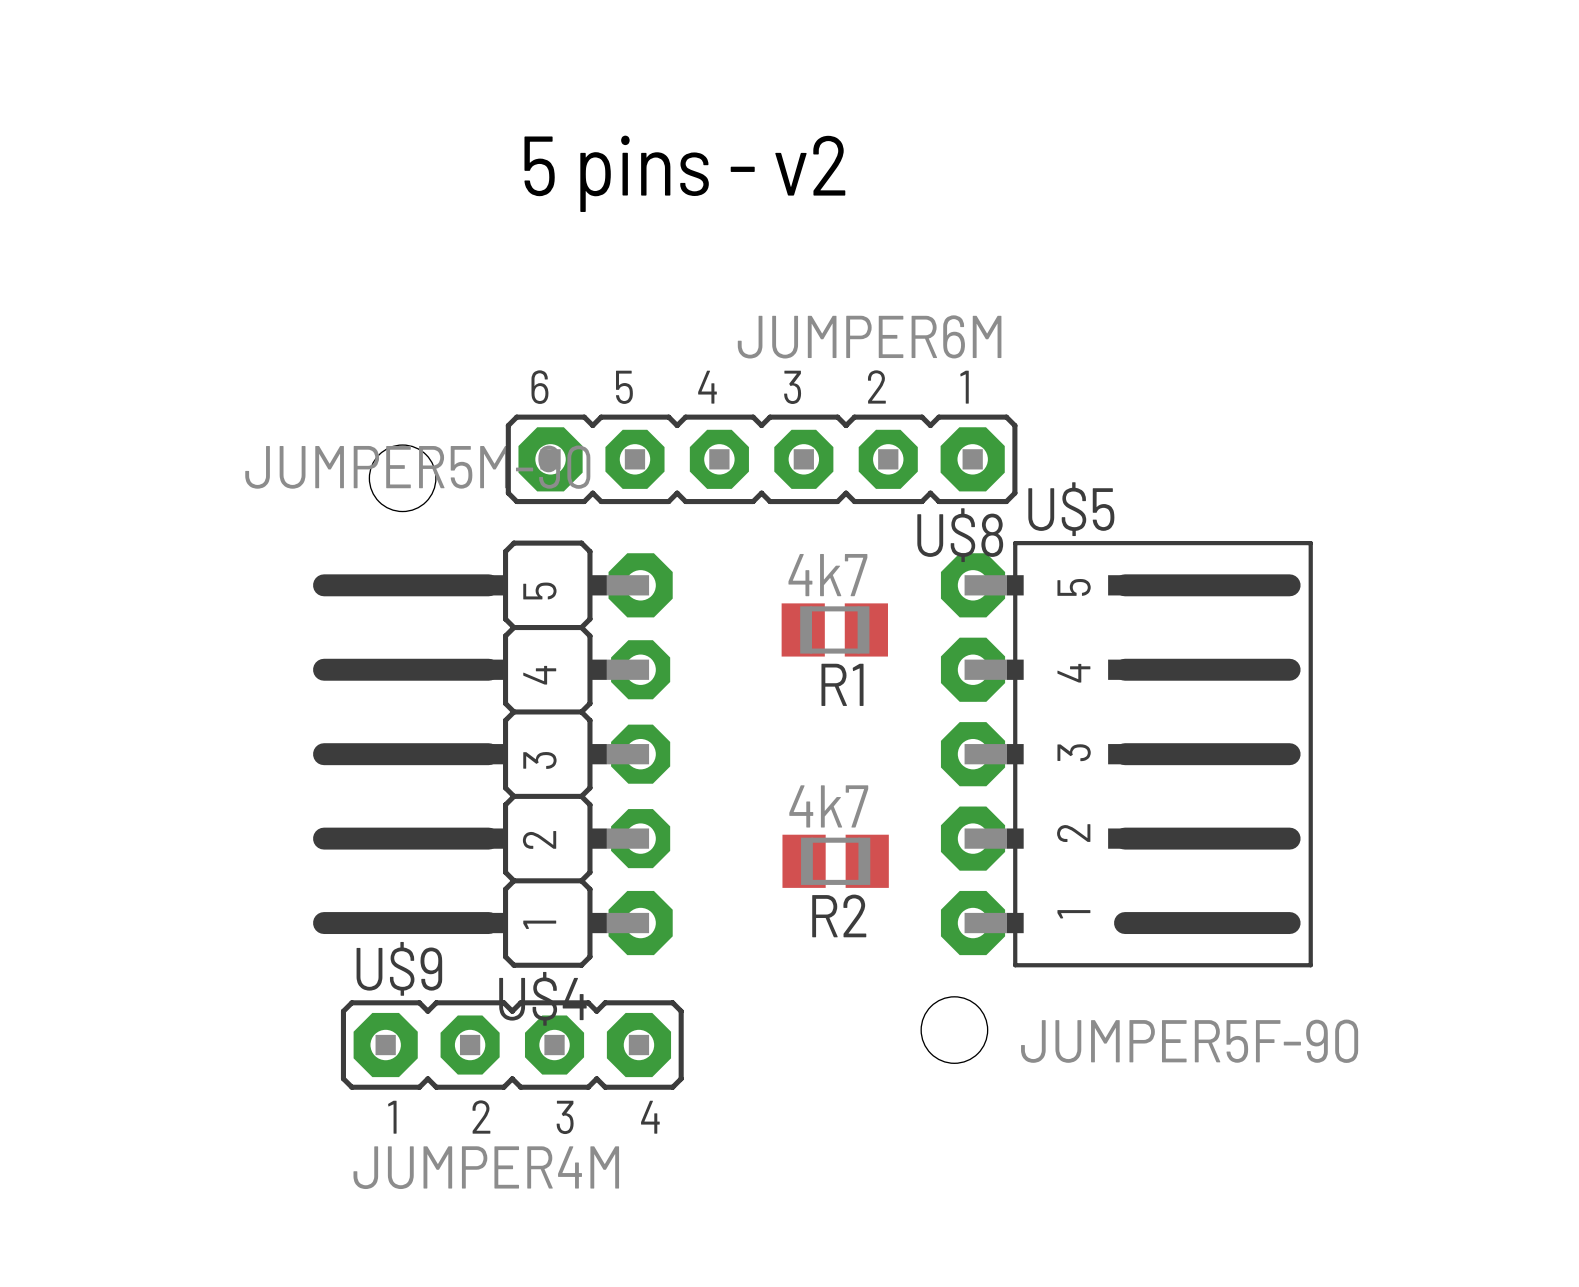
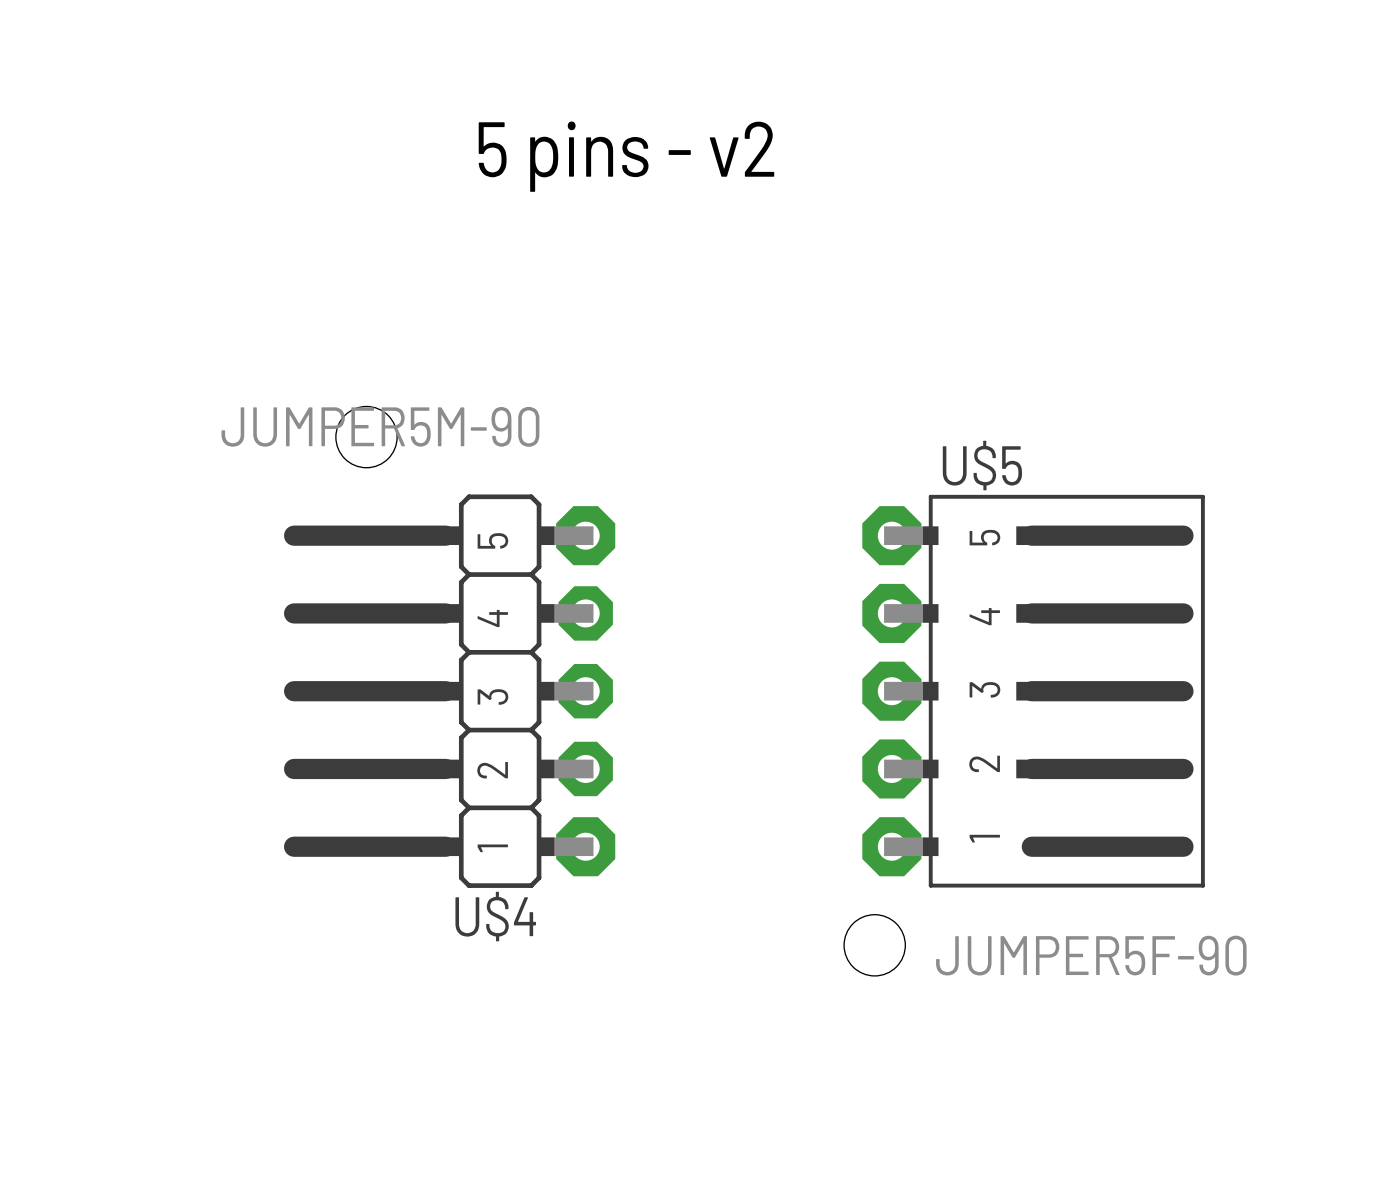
U$8: JUMPER6M (761, 459) -> none
R1: 4k7 (834, 629) -> none
R2: 4k7 (835, 861) -> none
U$9: JUMPER4M (512, 1045) -> none

